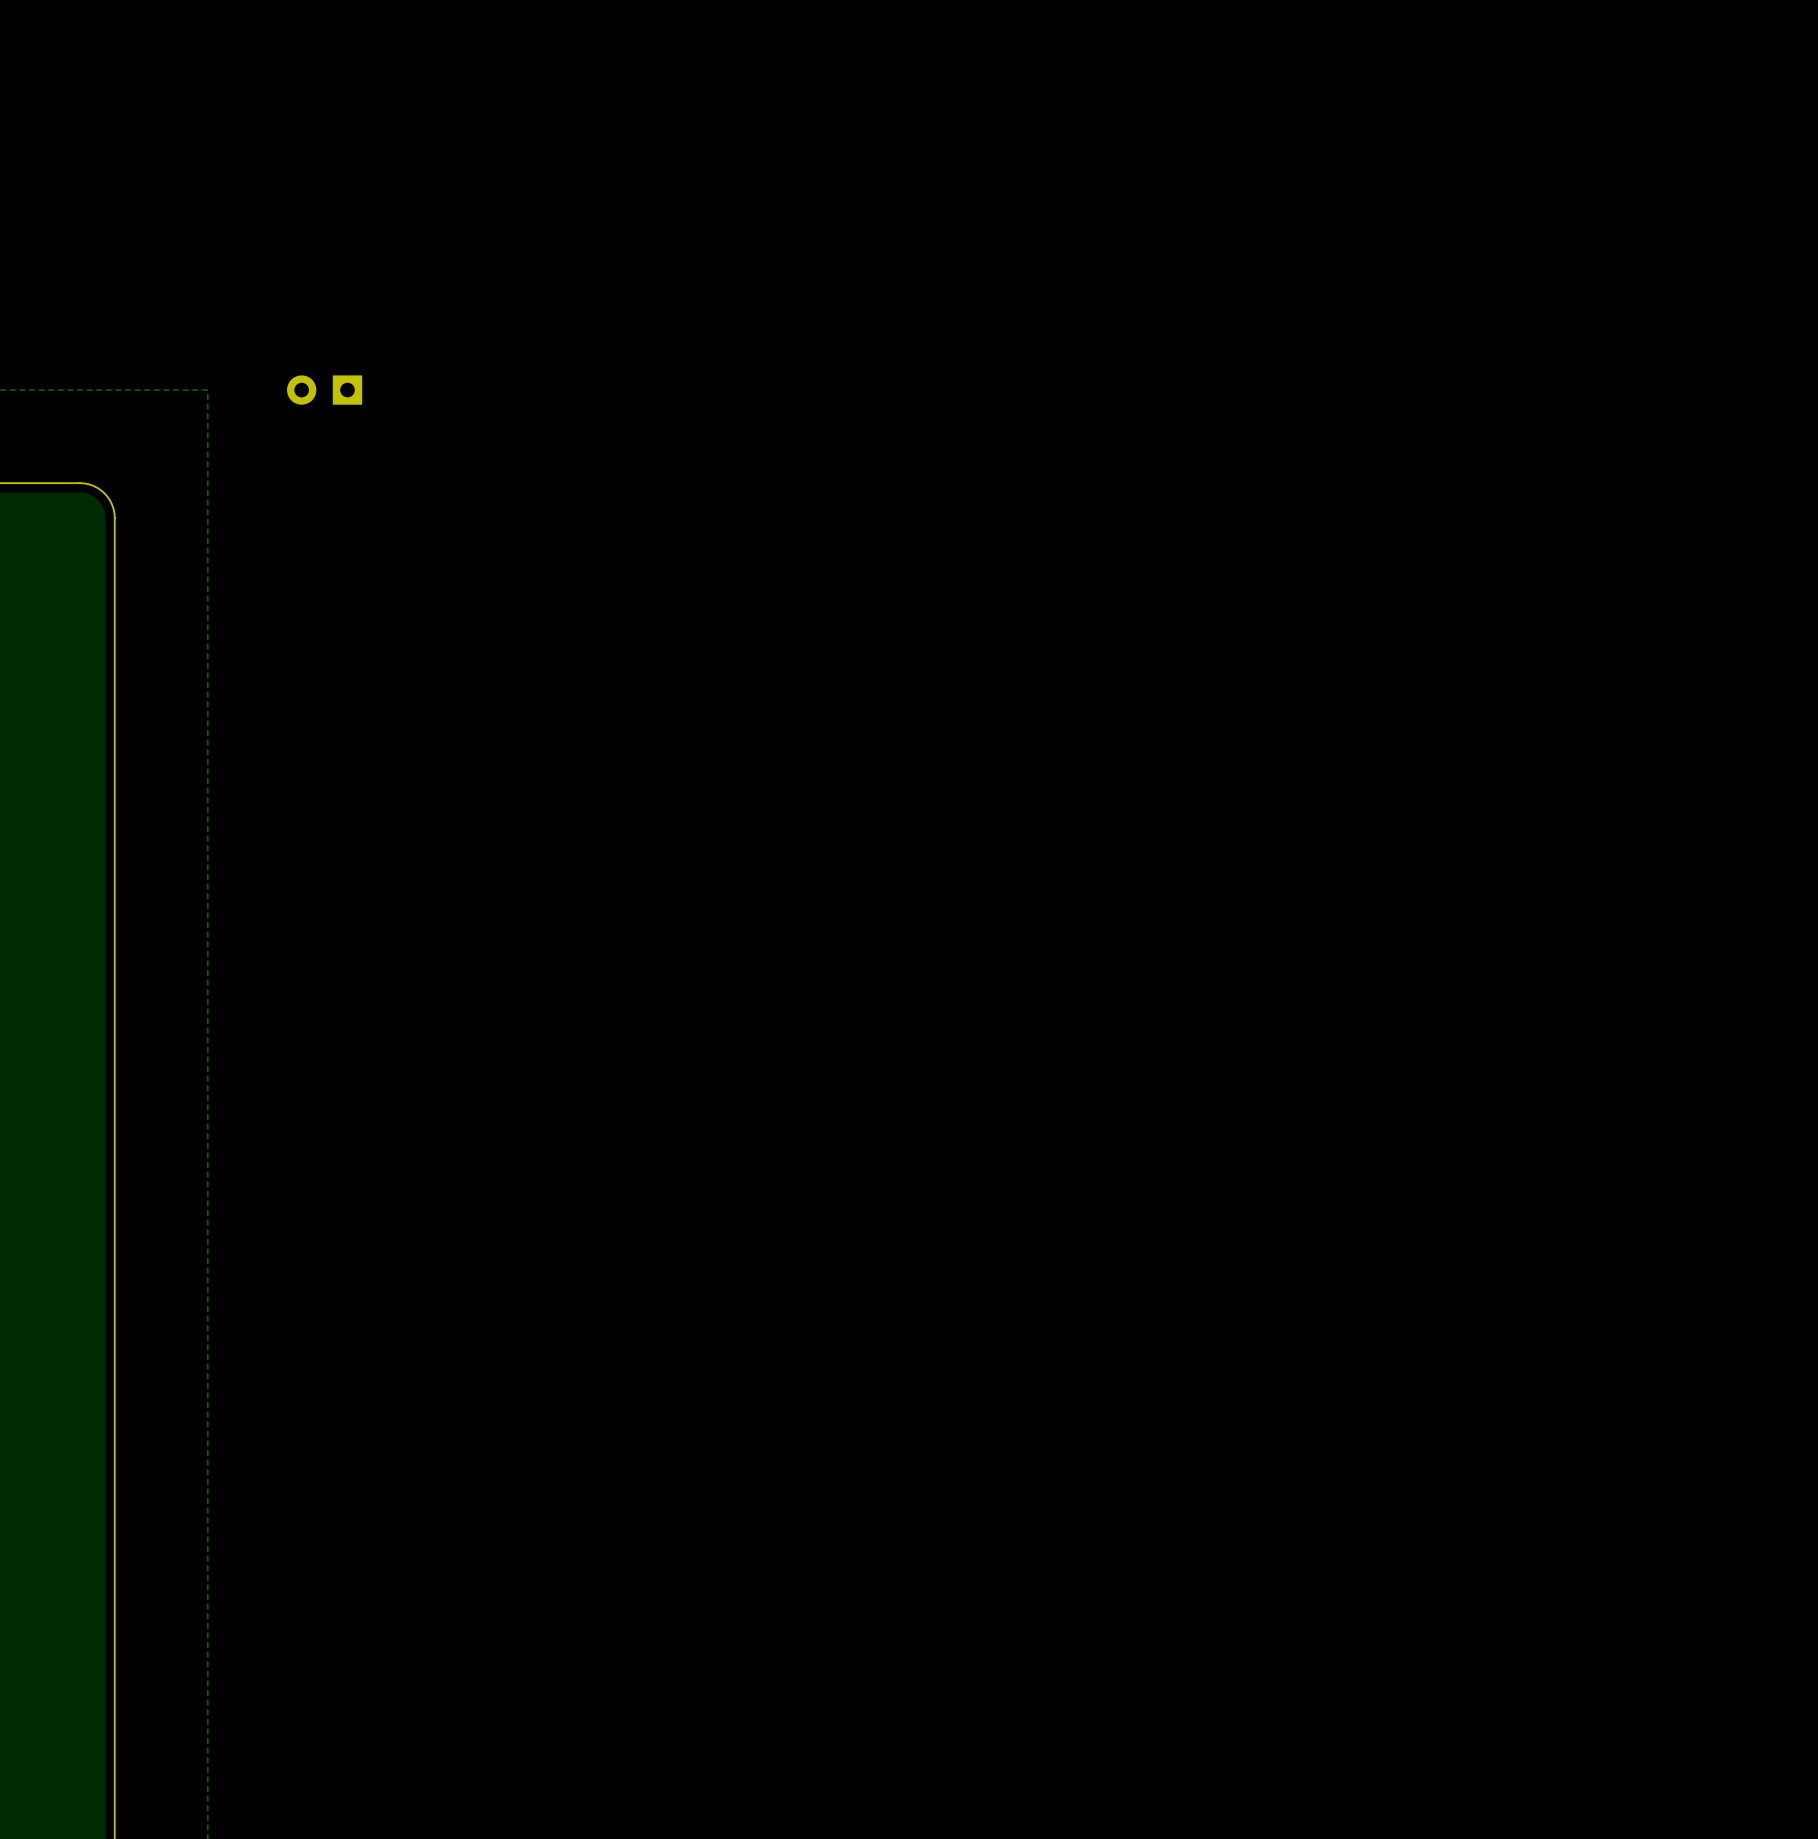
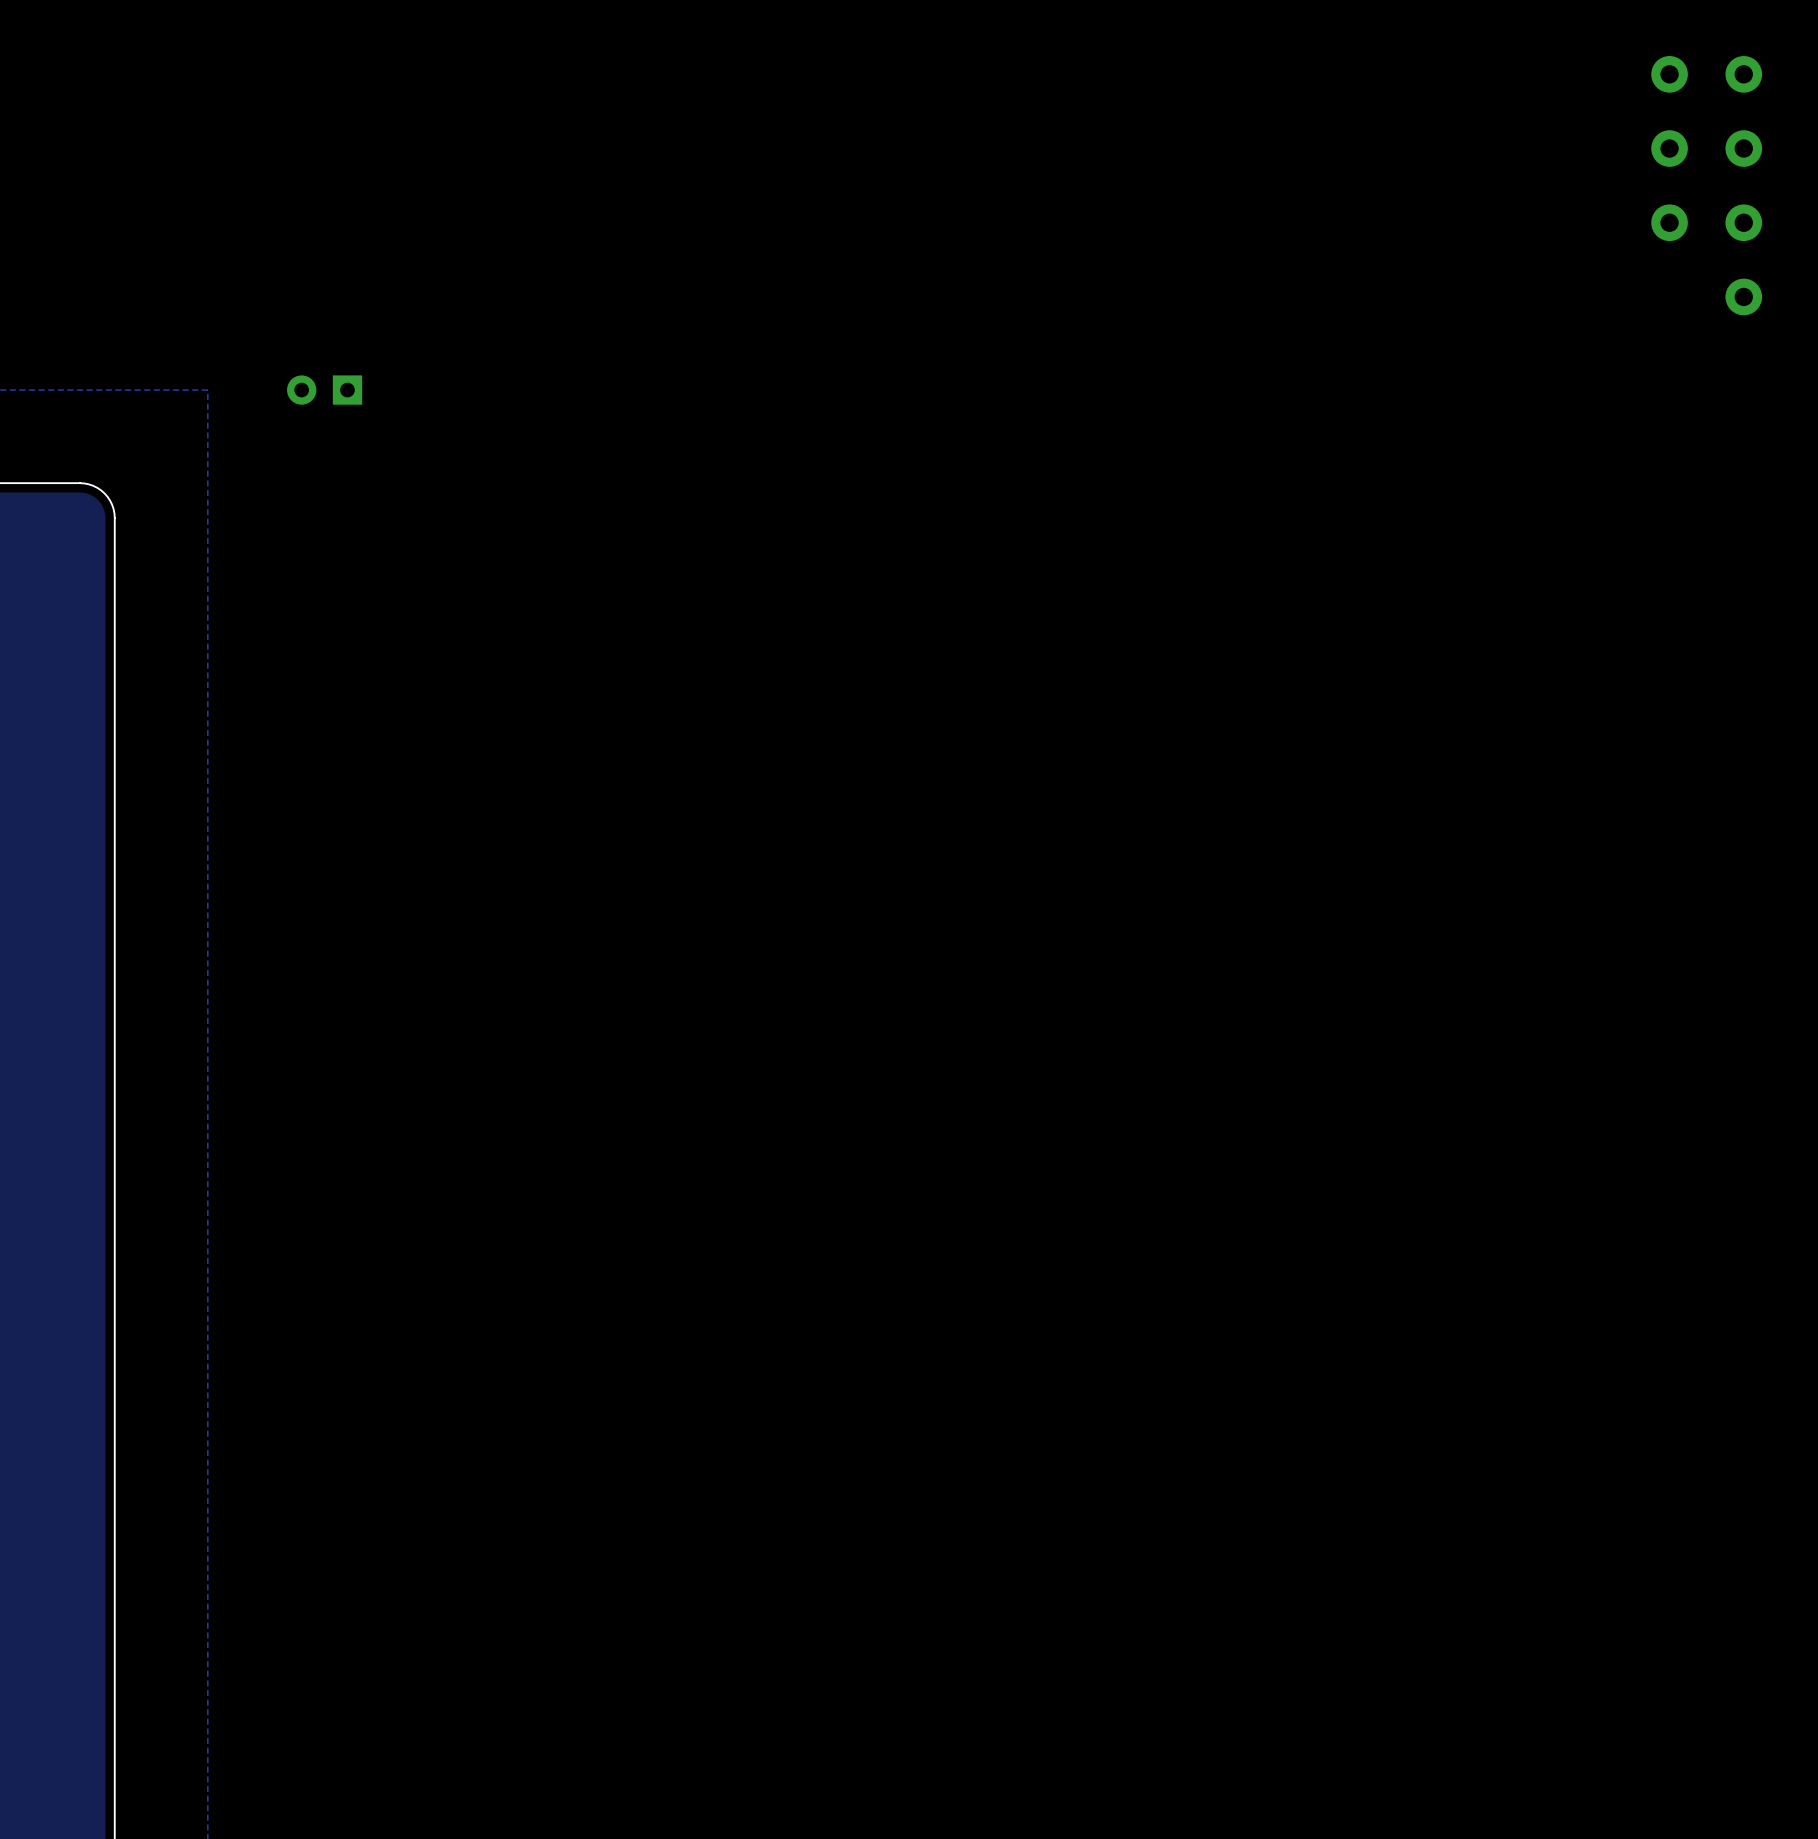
part: none -> (1669, 74)
part: none -> (1743, 74)
part: none -> (1669, 148)
part: none -> (1743, 148)
part: none -> (1669, 222)
part: none -> (1743, 222)
part: none -> (1743, 296)

